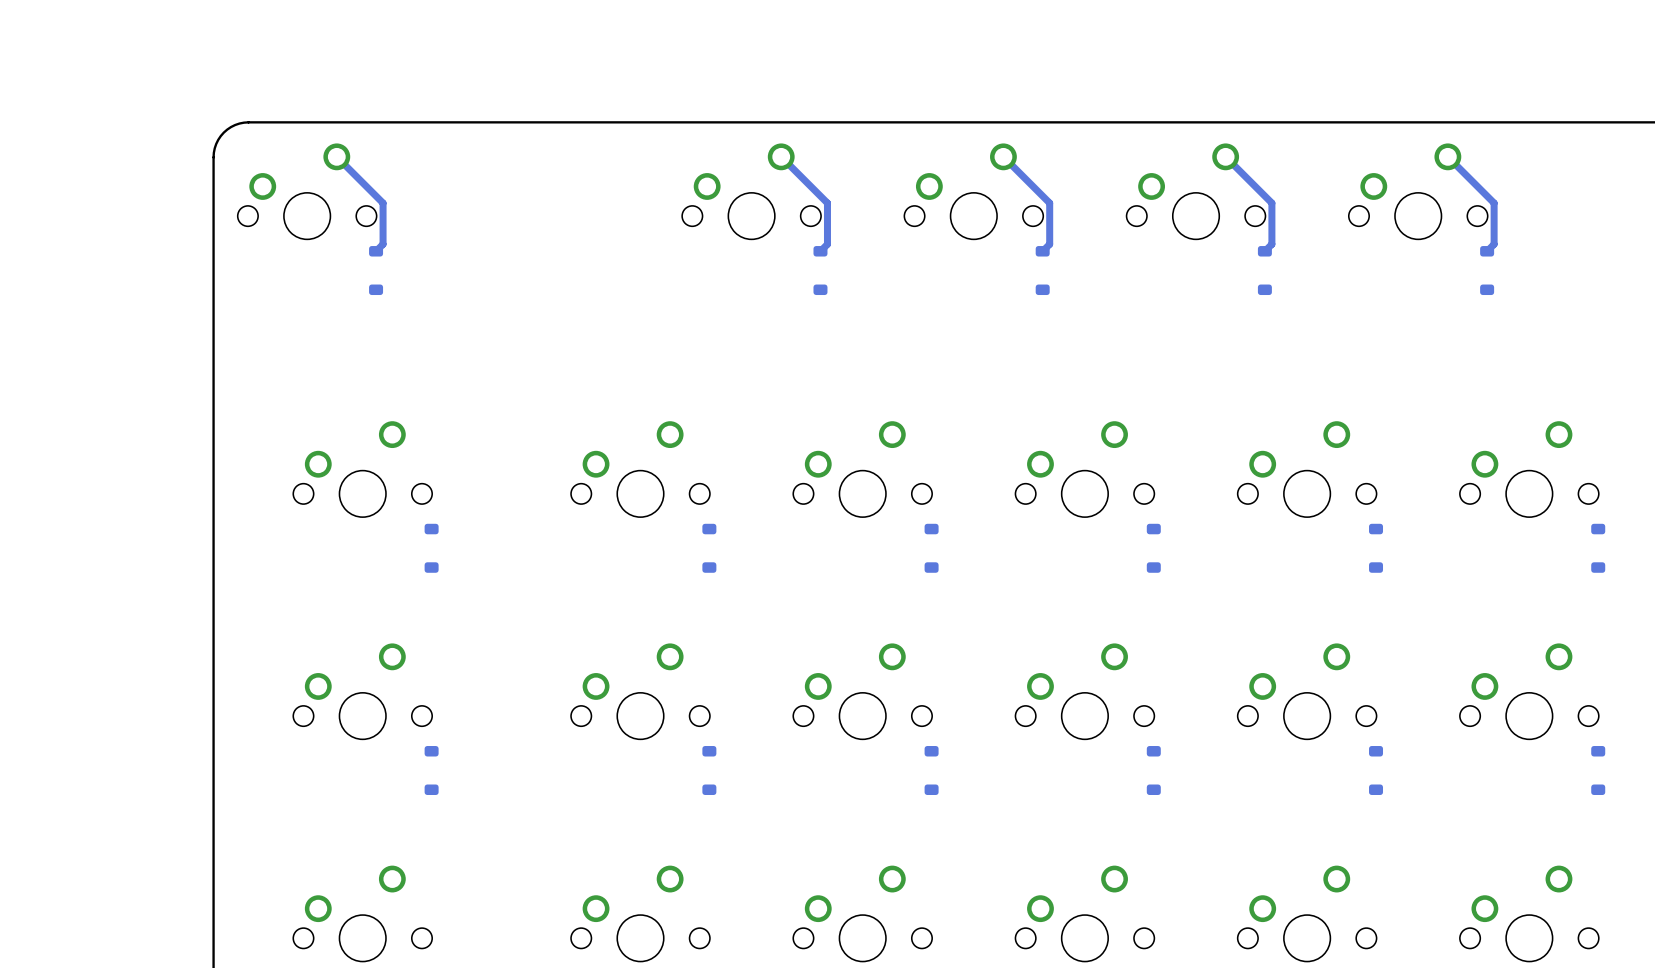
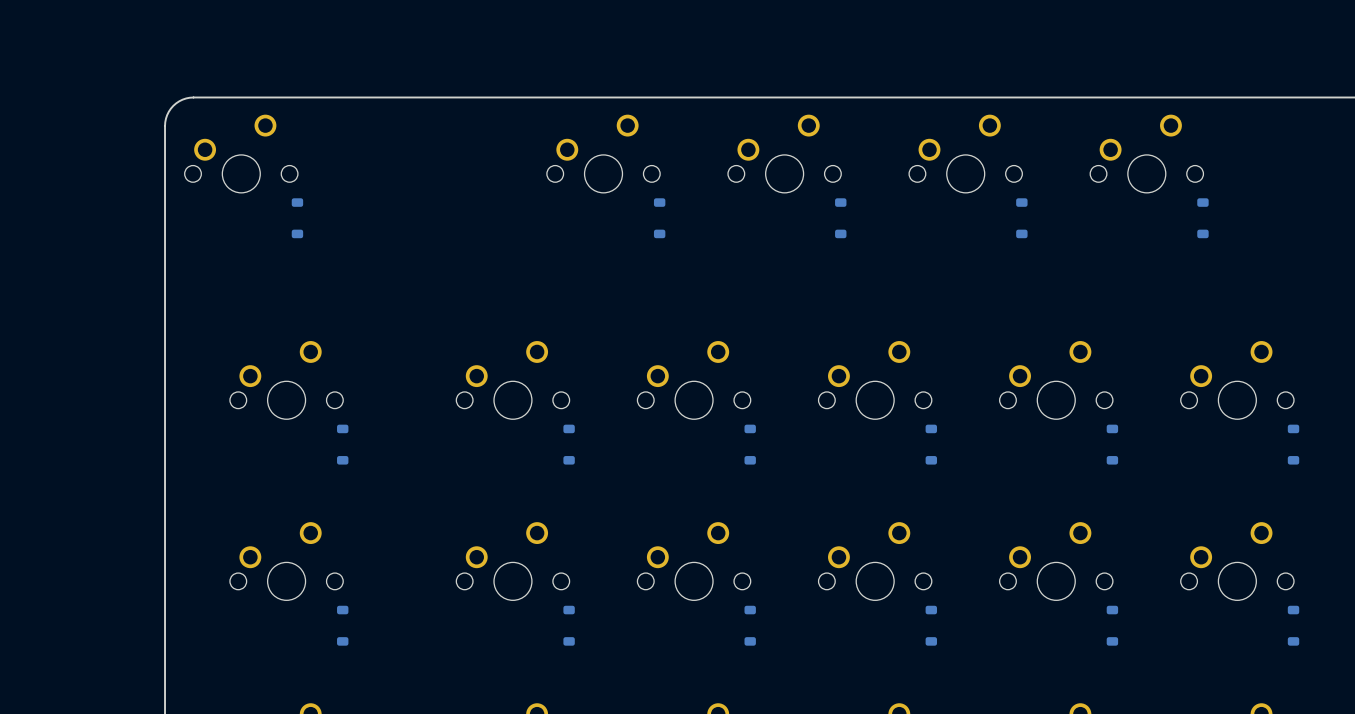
bottom track: (336, 156) (383, 203) (383, 244) (376, 251) -> none
bottom track: (781, 156) (827, 203) (827, 244) (820, 251) -> none
bottom track: (1003, 156) (1049, 203) (1049, 244) (1042, 251) -> none
bottom track: (1225, 156) (1271, 203) (1271, 244) (1264, 251) -> none
bottom track: (1447, 156) (1494, 203) (1494, 244) (1487, 251) -> none

